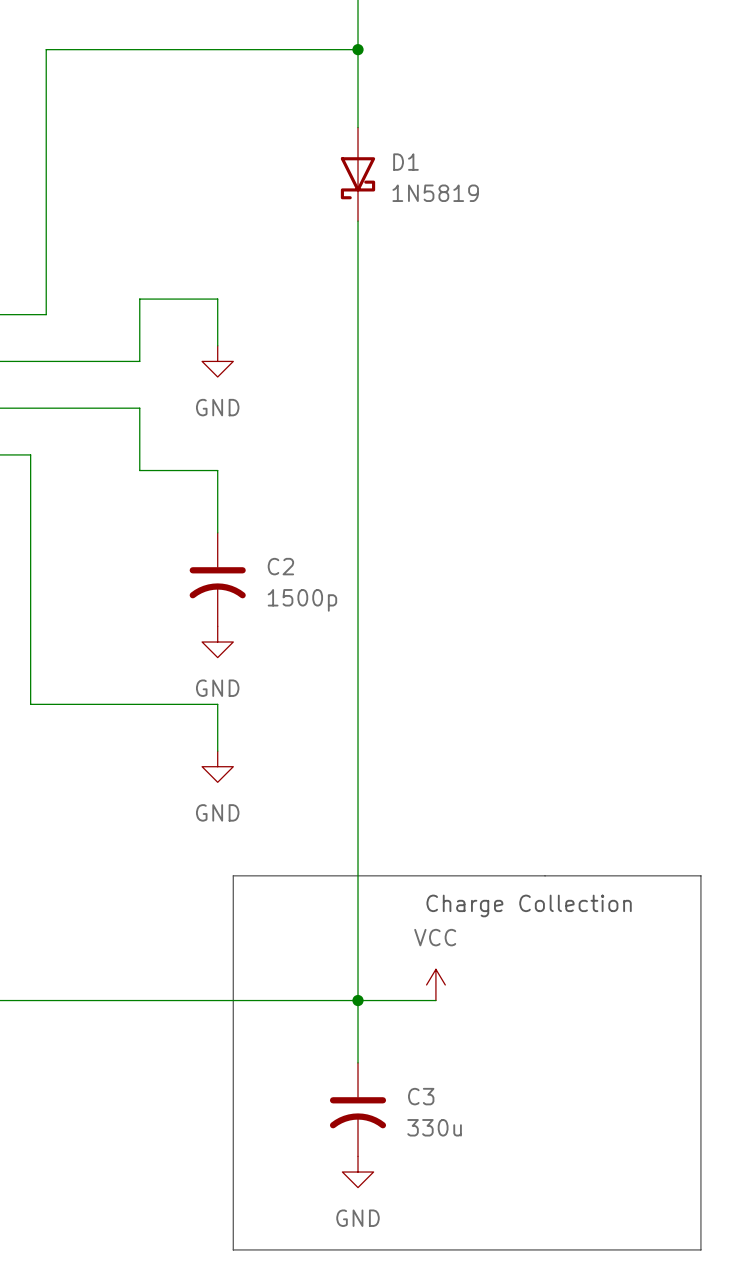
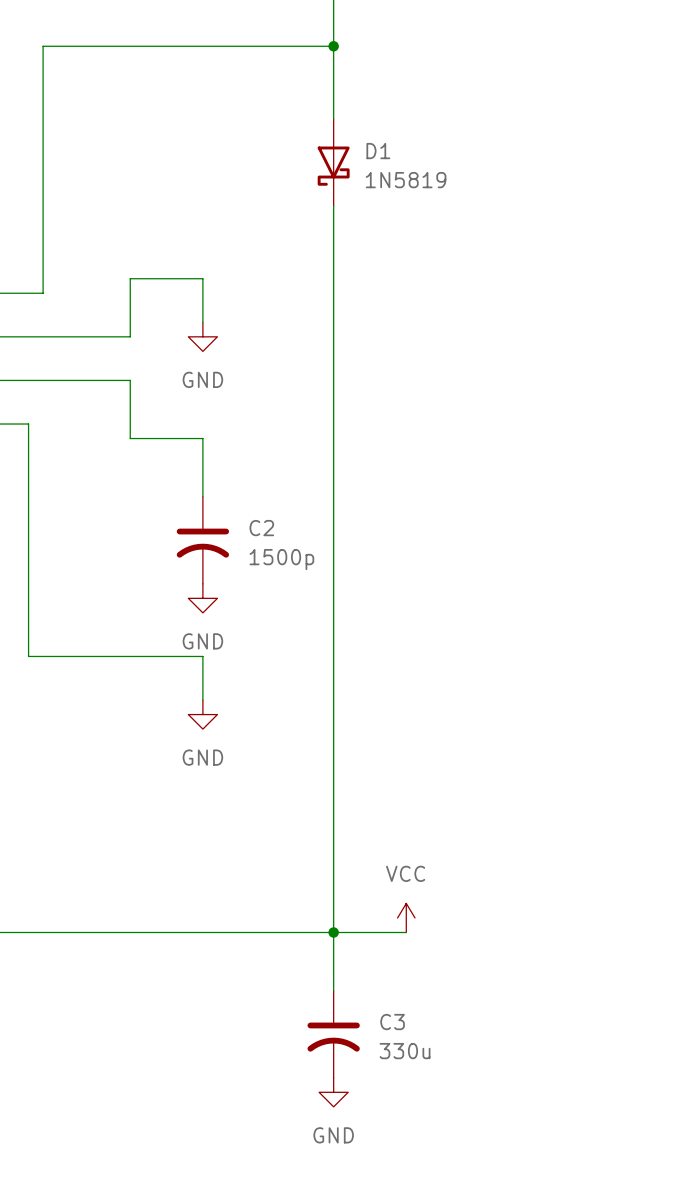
line: (233, 875) (700, 875) (700, 1249) (233, 1249) (233, 875) -> none
text: Charge Collection (529, 905) -> none

